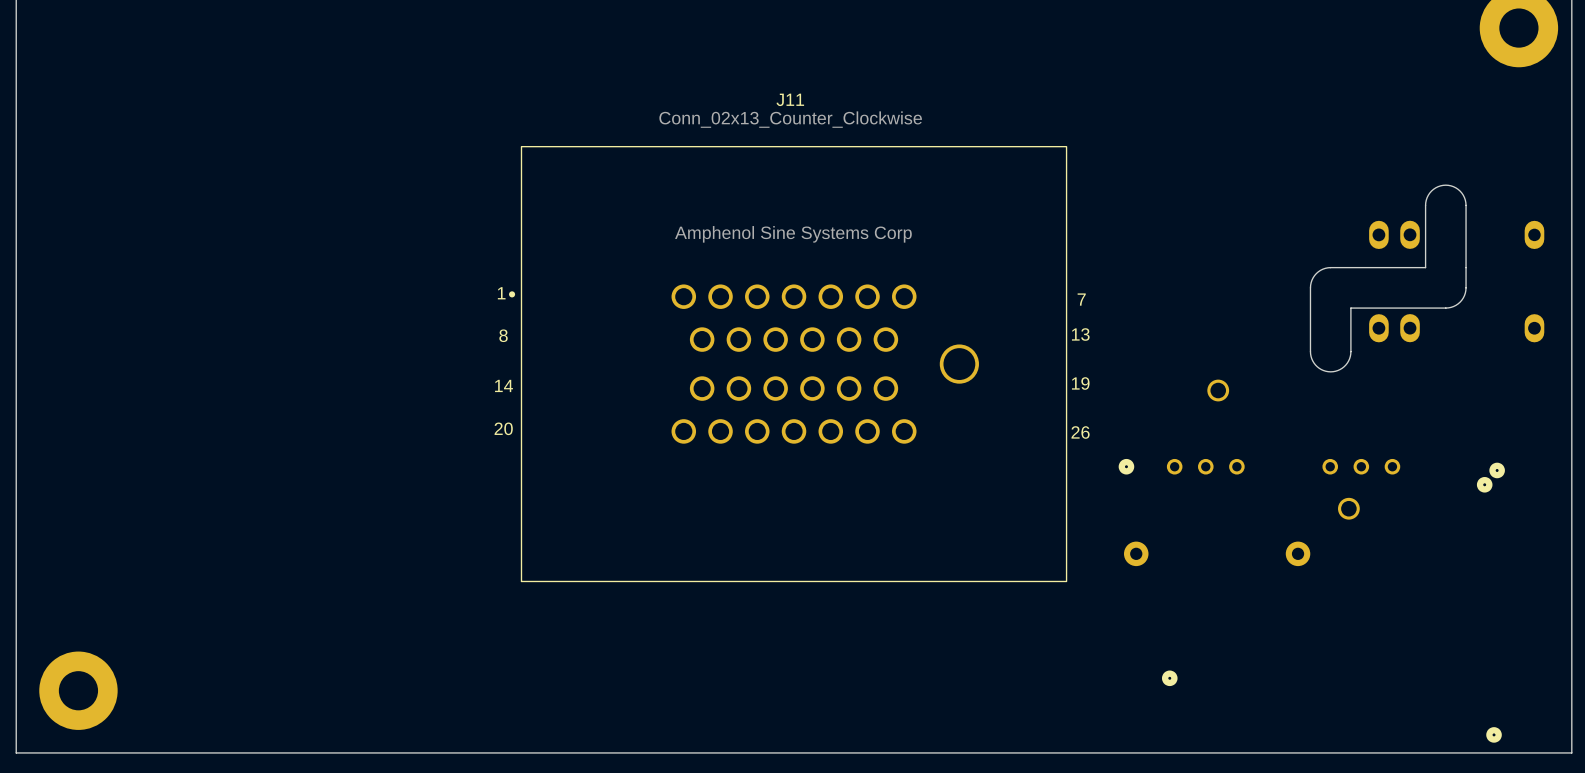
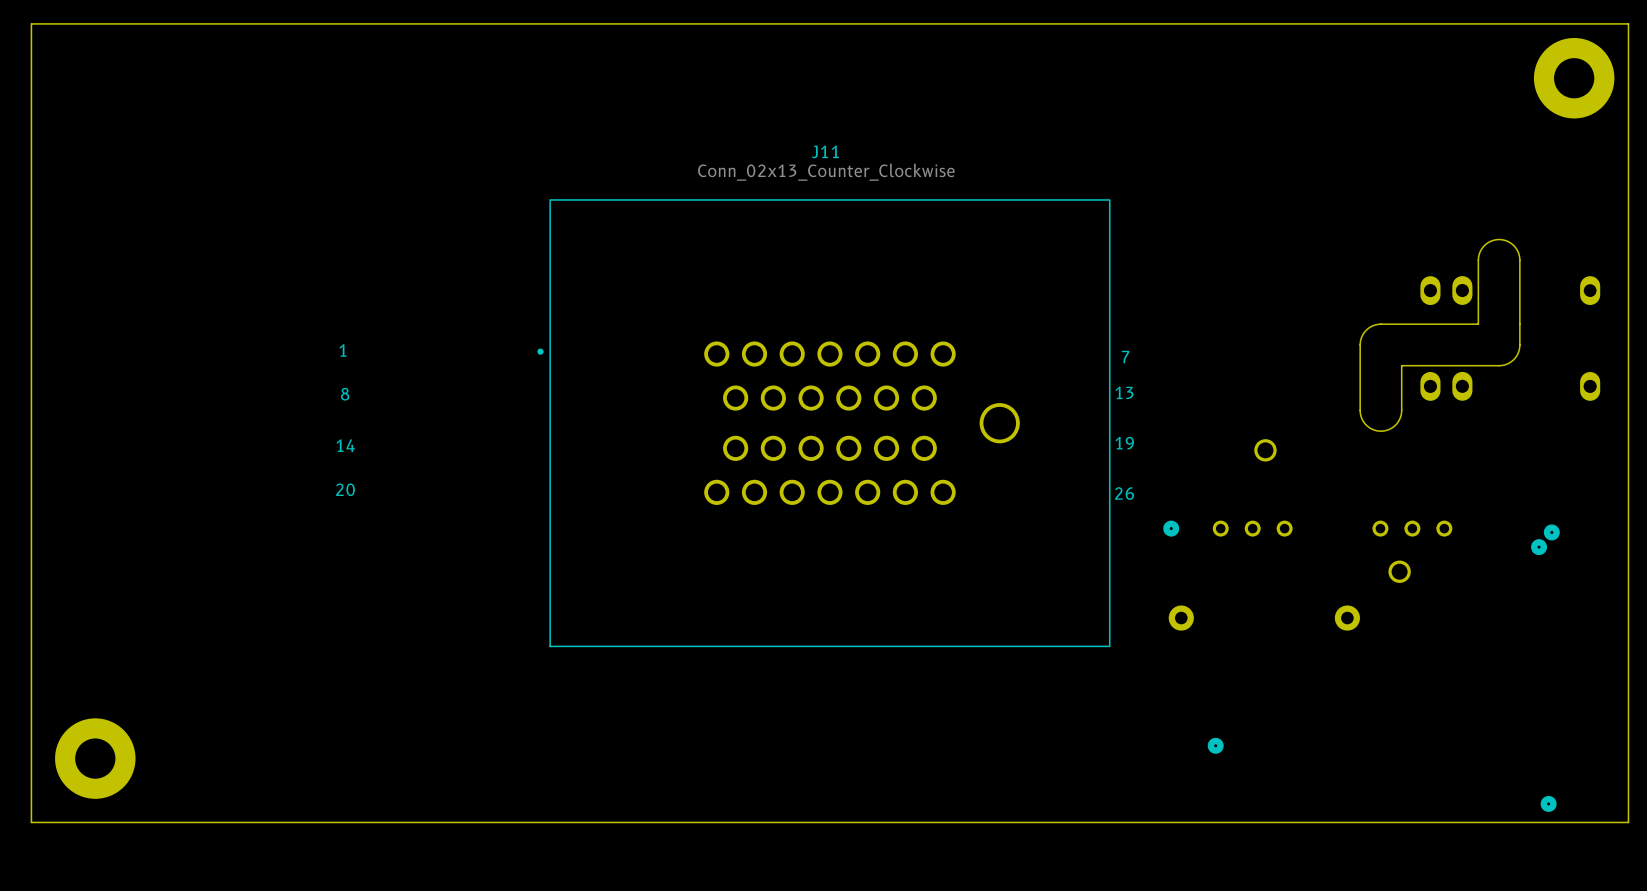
J11 text: Amphenol Sine Systems Corp (793, 234) -> none
J11 text position: 1 (501, 293) -> 1 (342, 350)
J11 text position: 8 (503, 335) -> 8 (345, 394)
J11 text position: 14 (504, 385) -> 14 (345, 445)
J11 text position: 20 (503, 428) -> 20 (345, 489)

